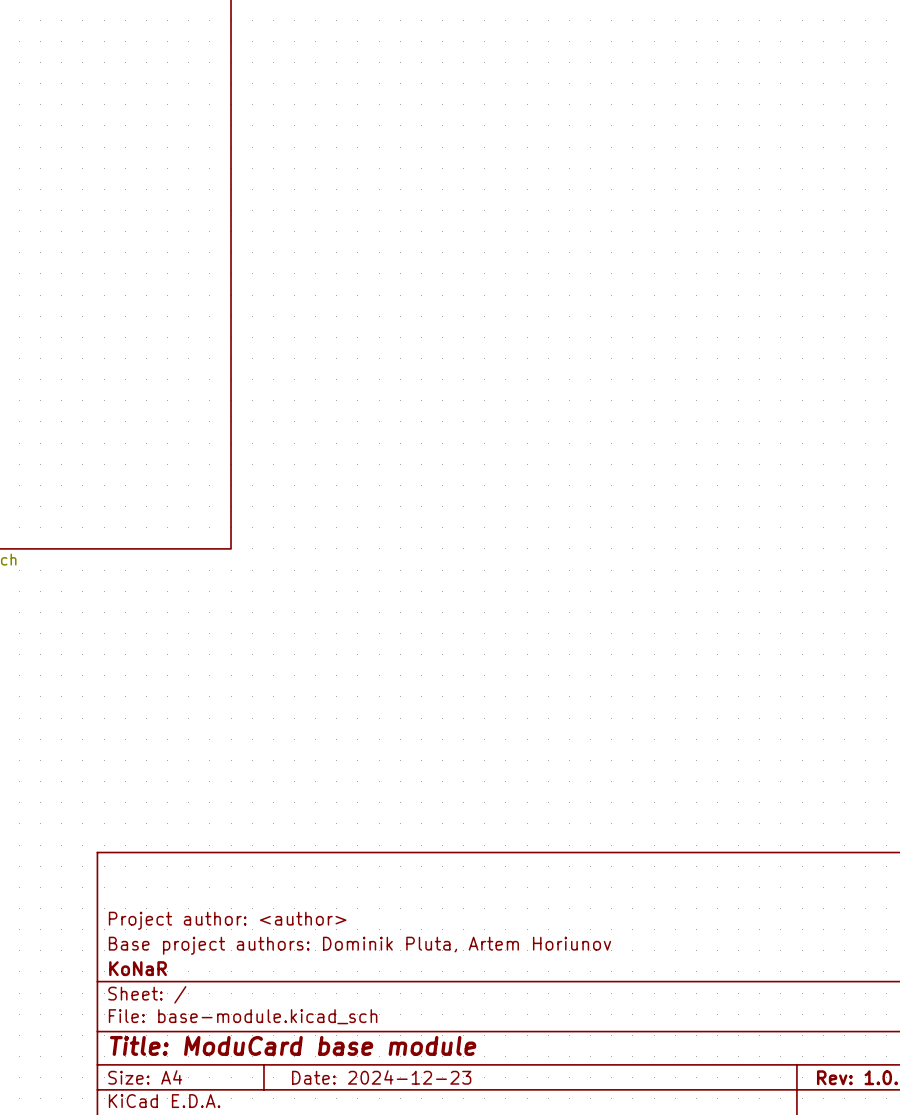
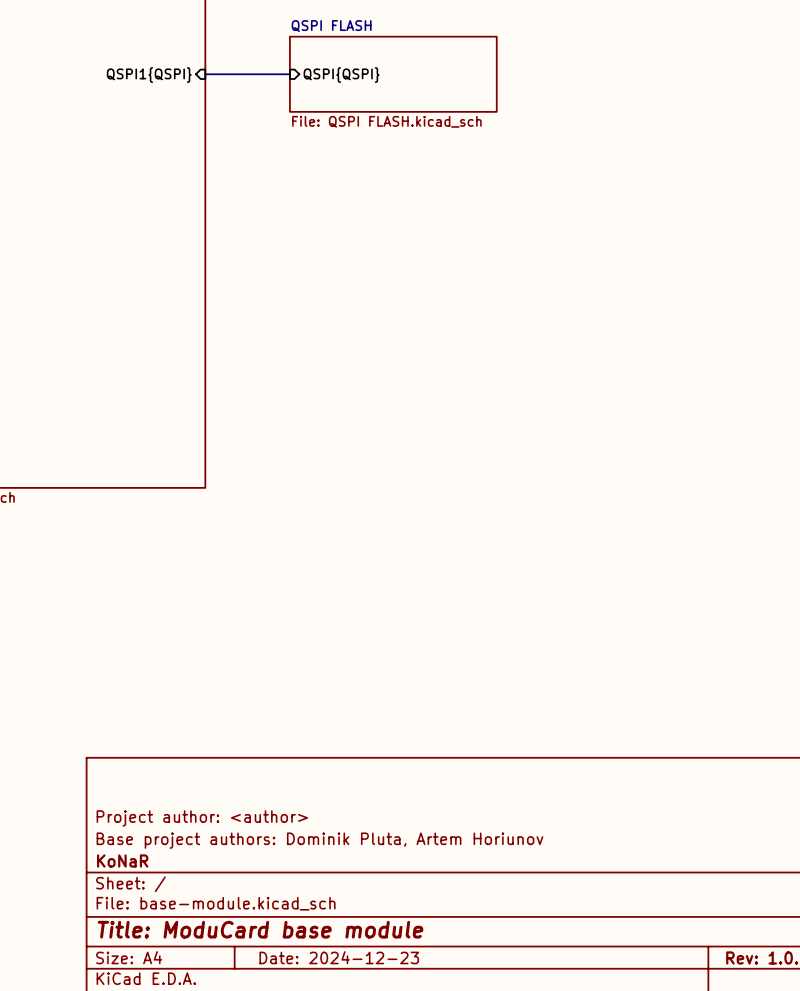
bus: none -> (205, 74) (289, 74)
sheet QSPI FLASH: none -> File: QSPI FLASH.kicad_sch (393, 74)
sheet pin: none -> QSPI1{QSPI} (149, 75)
sheet pin: none -> QSPI{QSPI} (341, 75)

